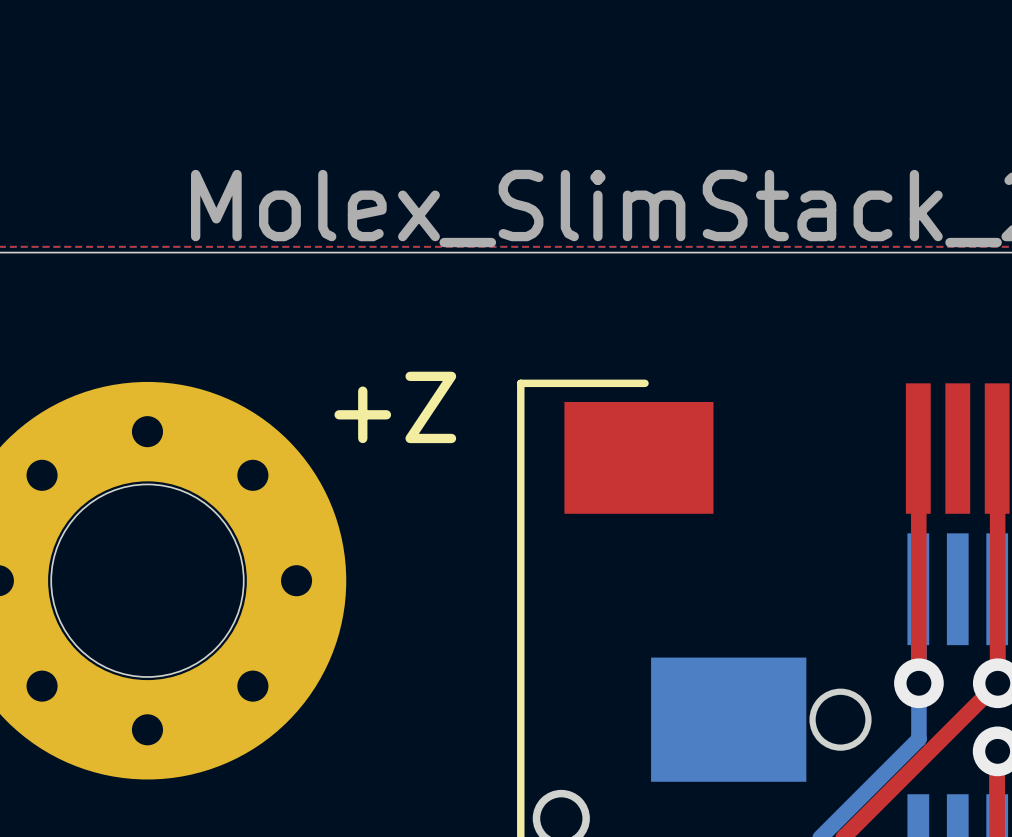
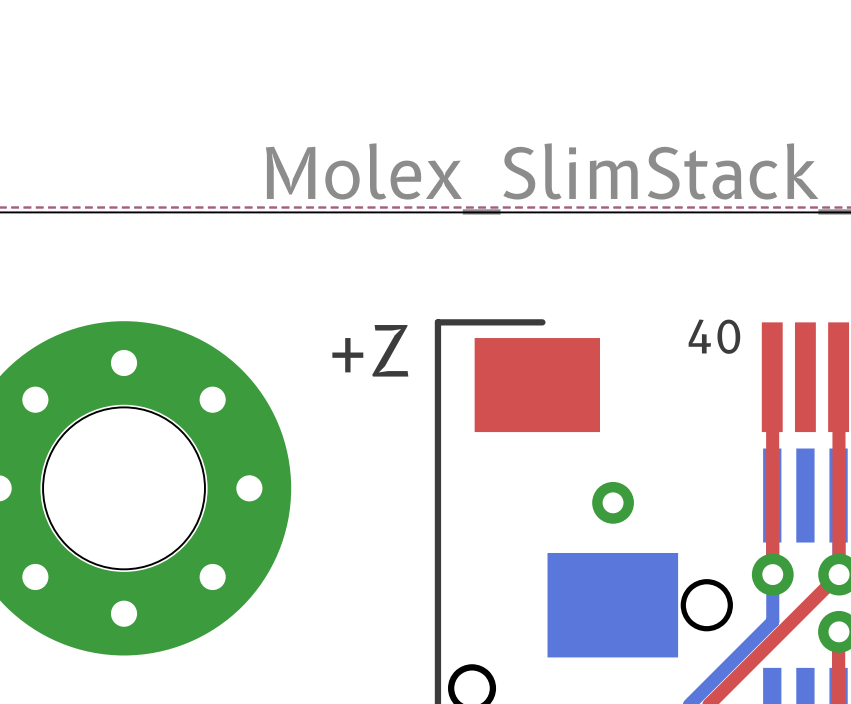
text: none -> 40 (714, 336)
text position: +Z (395, 407) -> +Z (370, 350)
via: none -> (613, 502)

